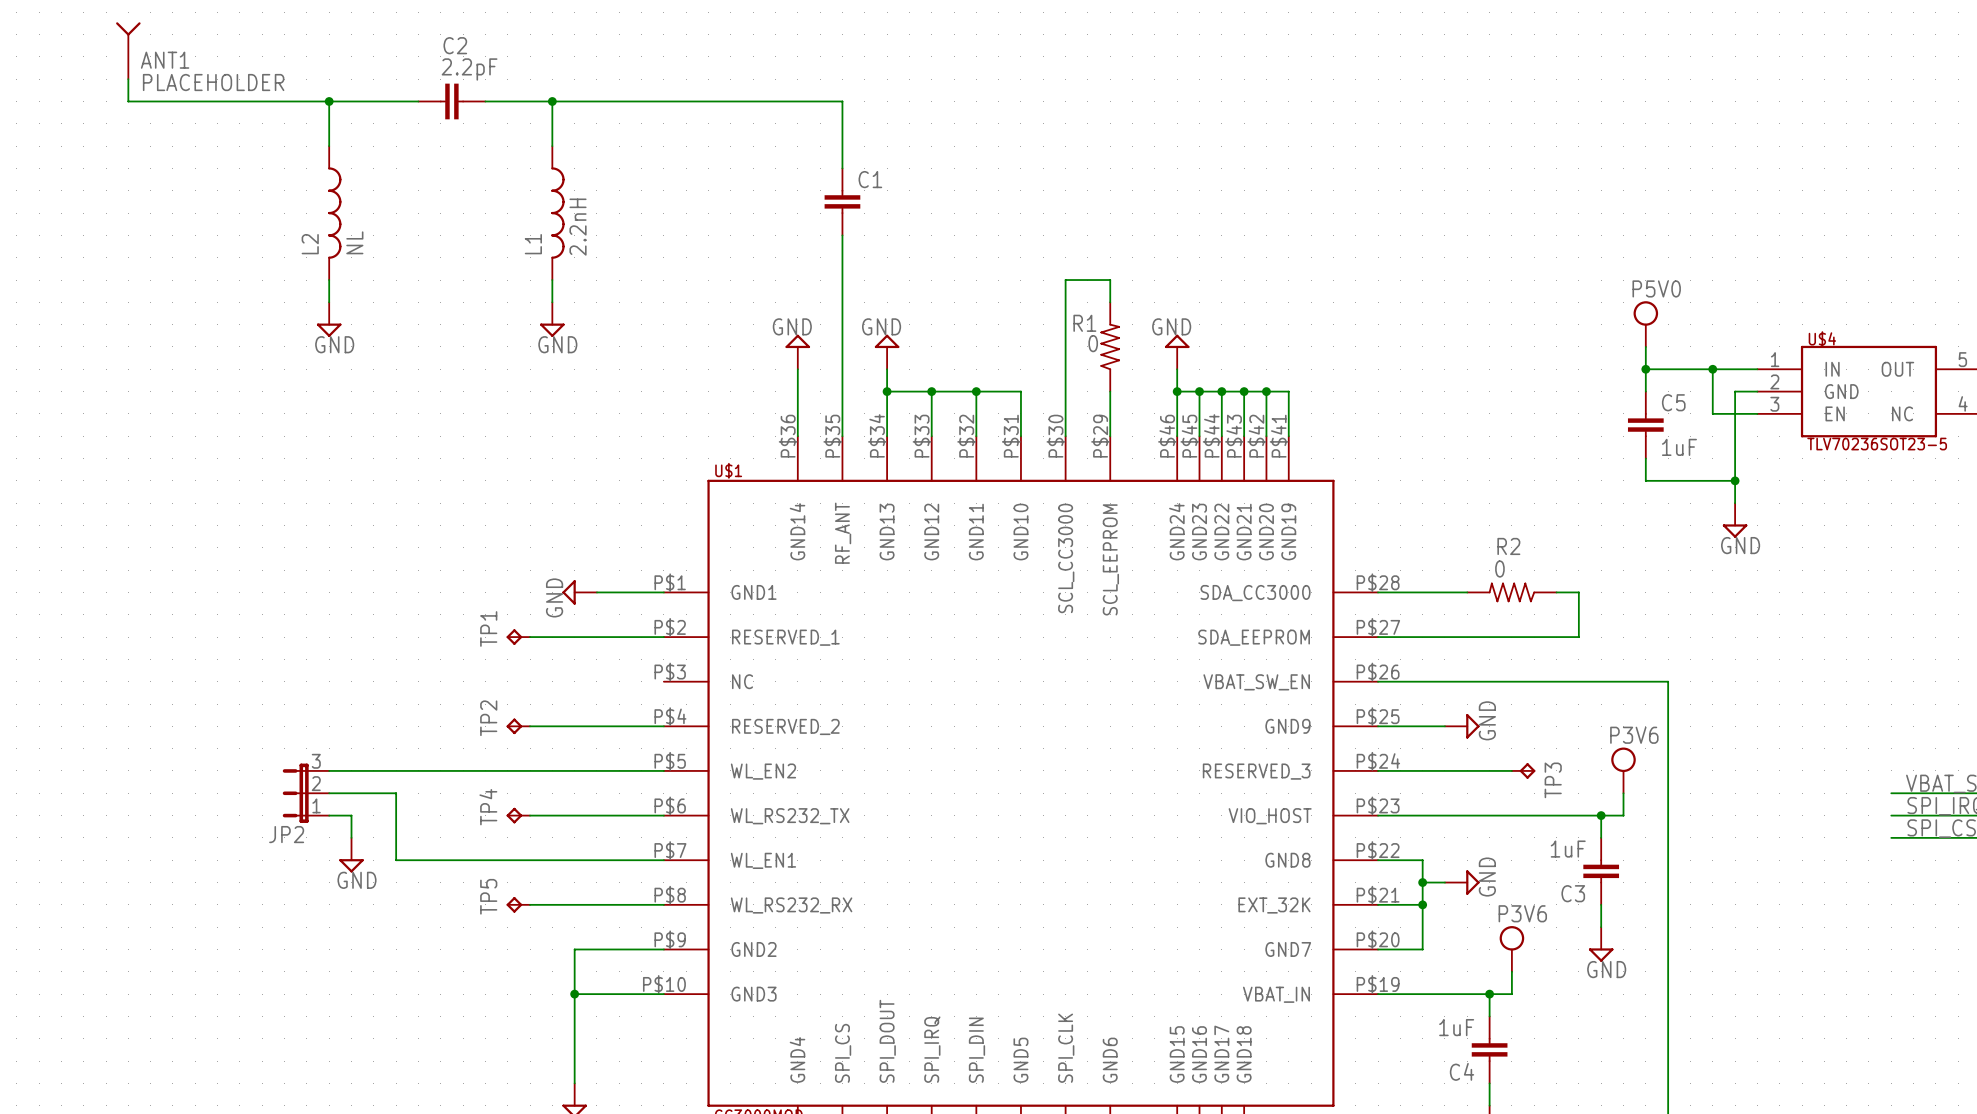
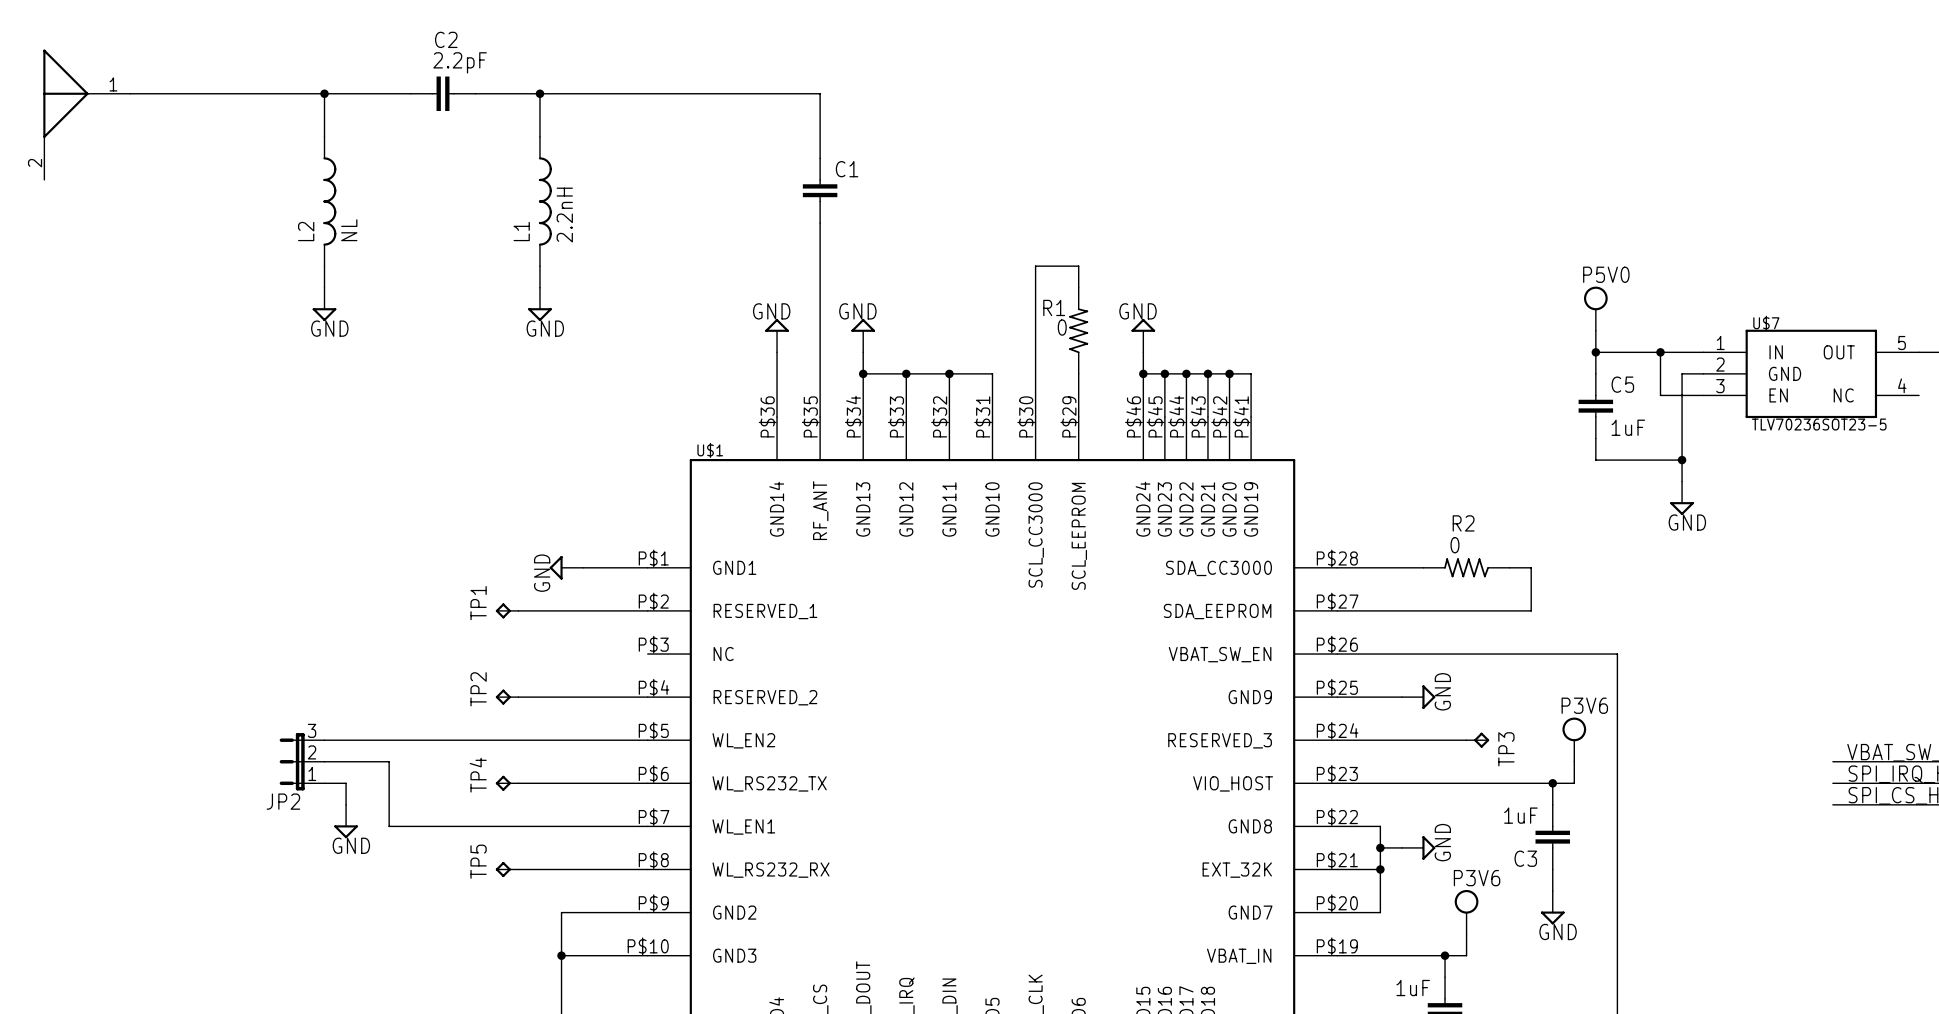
ANT1: PLACEHOLDER (128, 50) -> none
wire: (128, 79) (128, 101) -> none
part: none -> (86, 114)
U$4 name: U$4 (1822, 339) -> U$7 (1766, 323)

